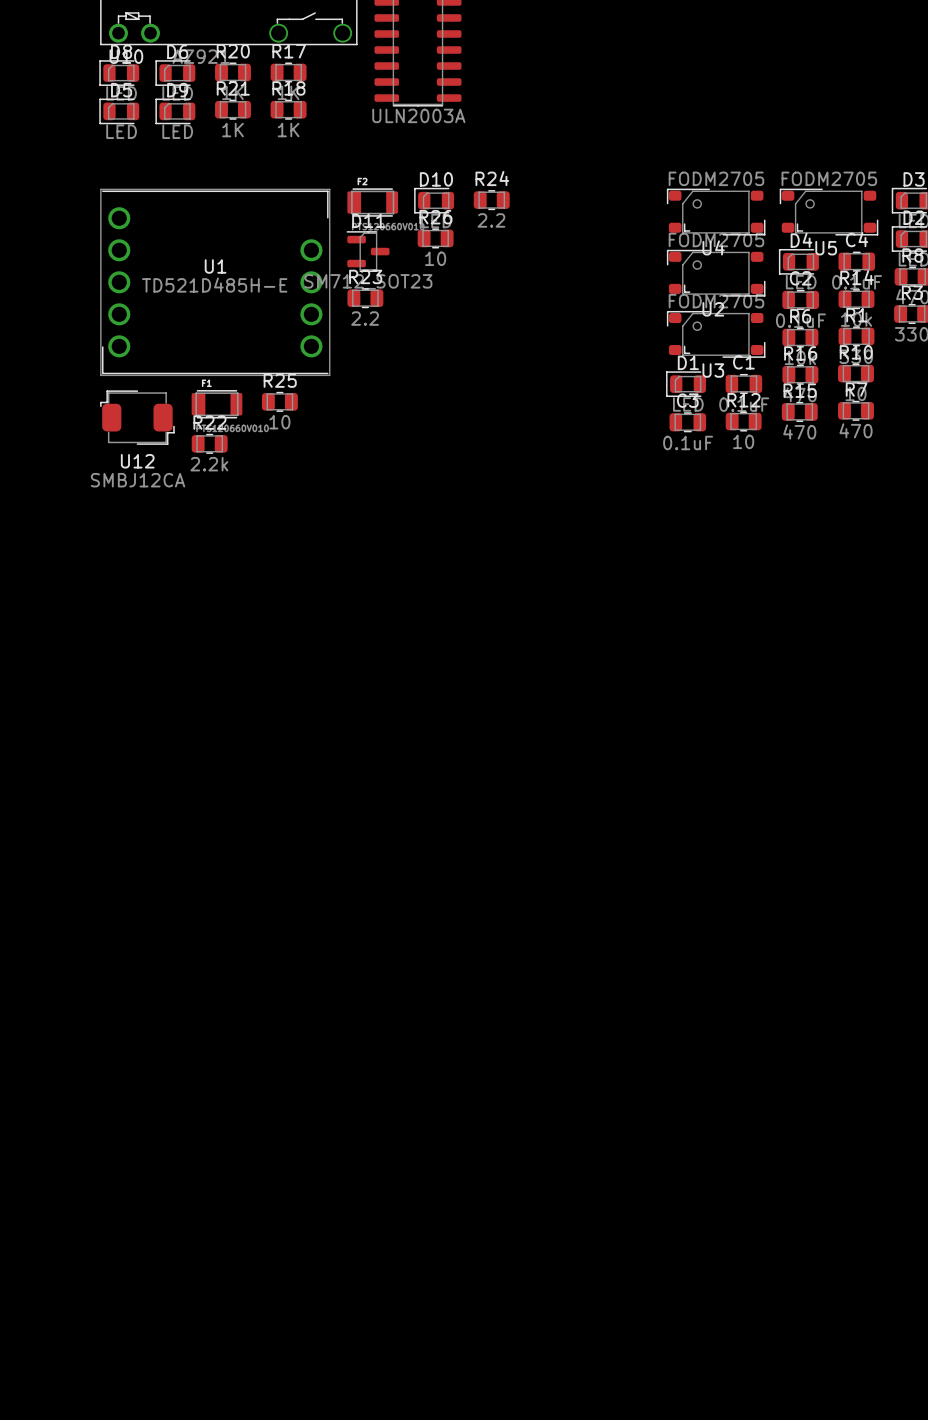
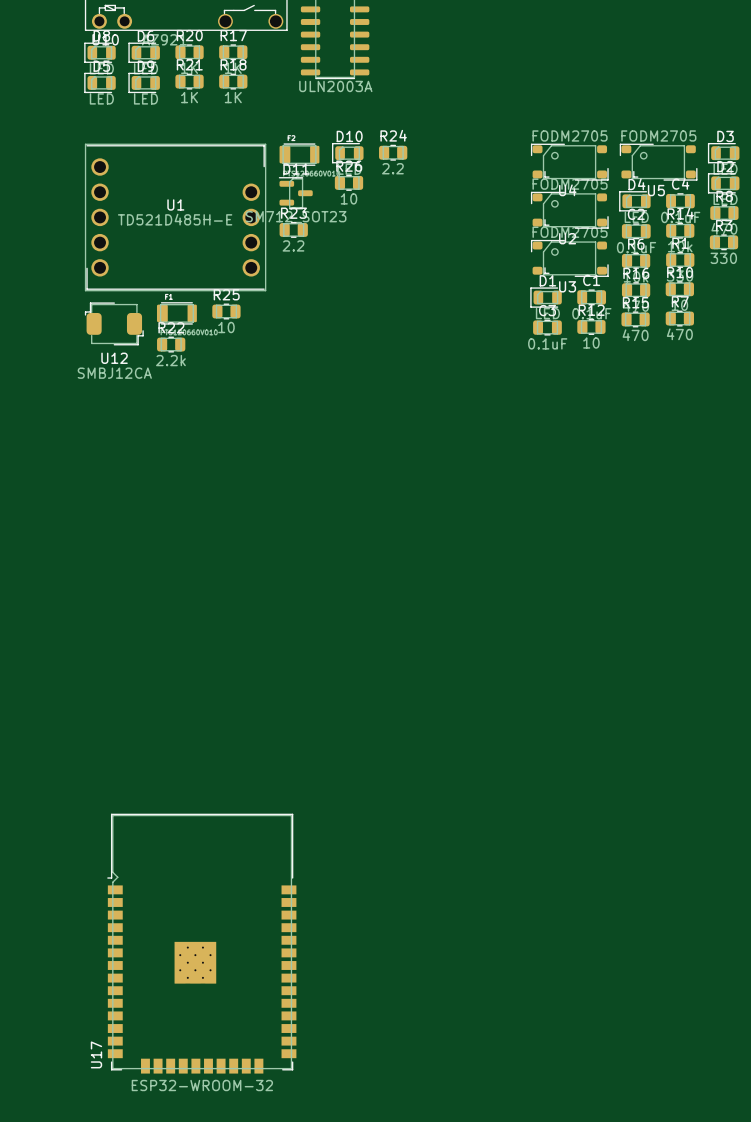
U17: none -> ESP32-WROOM-32 (201, 943)

